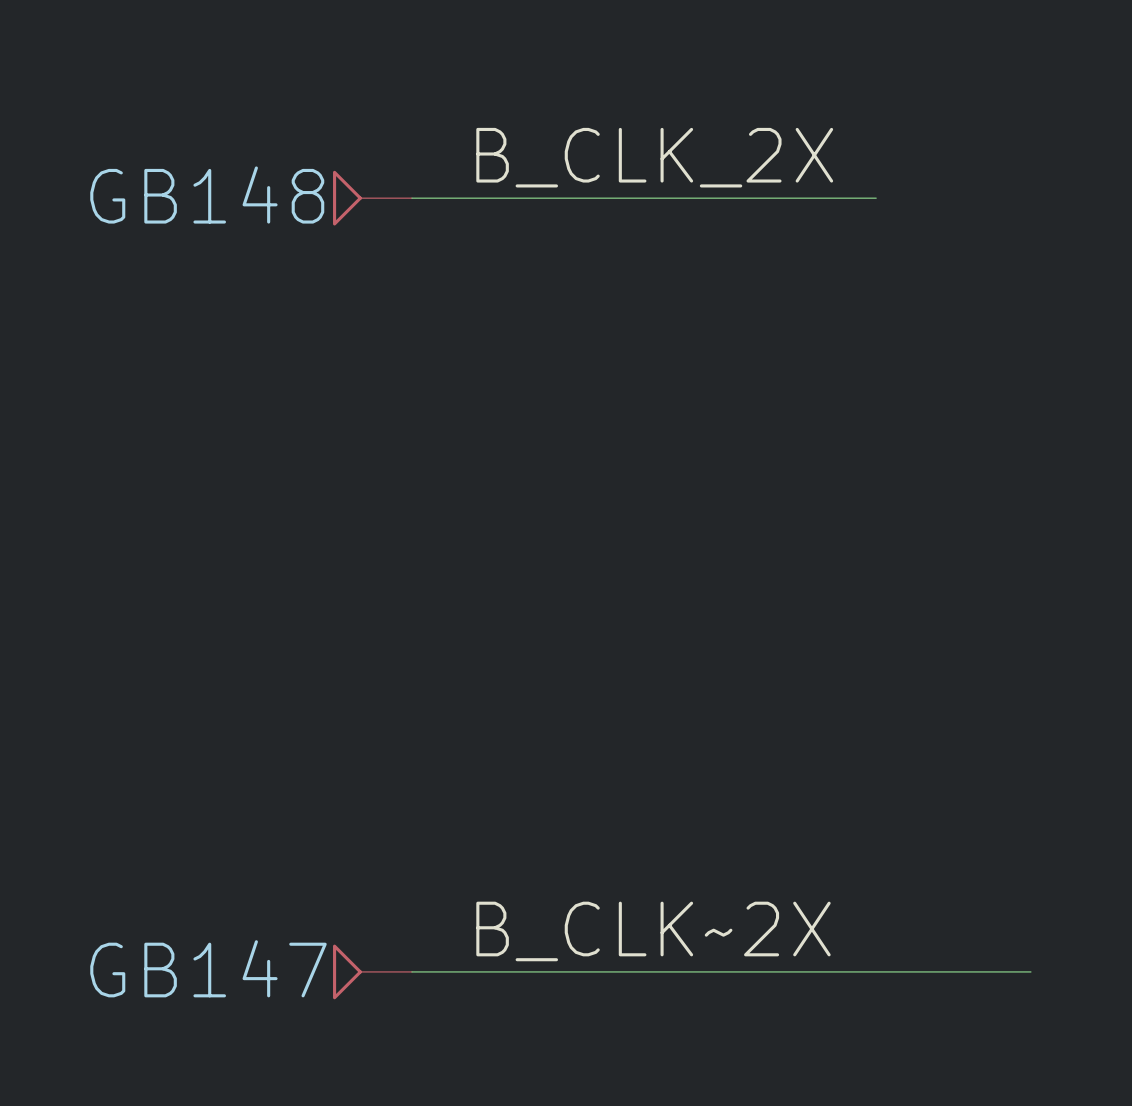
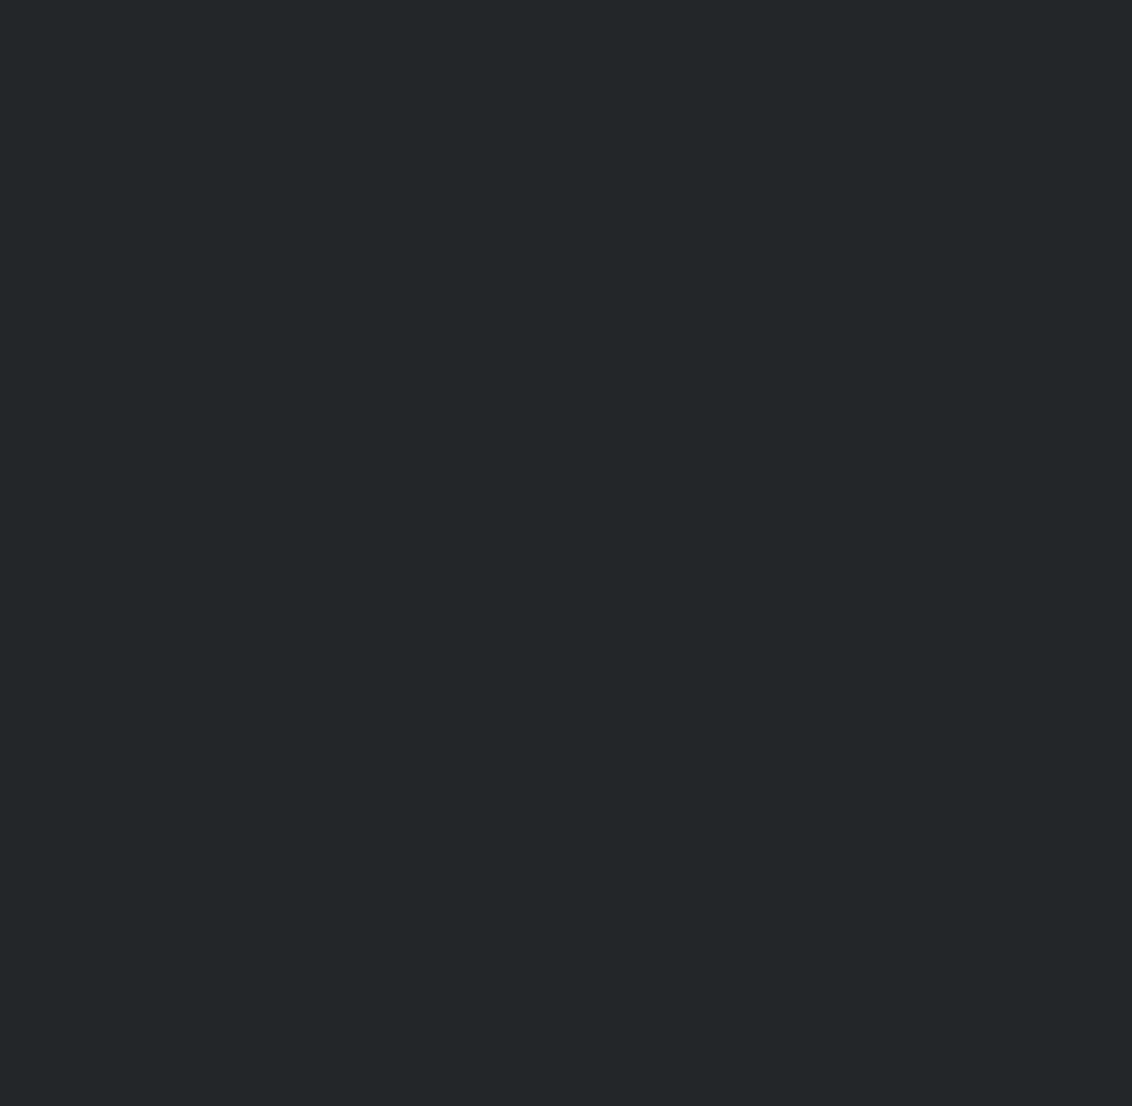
label: B_CLK_2X (654, 157) -> none
GB148: (372, 198) -> none
wire: (411, 198) (876, 198) -> none
label: B_CLK~2X (653, 931) -> none
GB147: (372, 971) -> none
wire: (411, 971) (1030, 971) -> none

